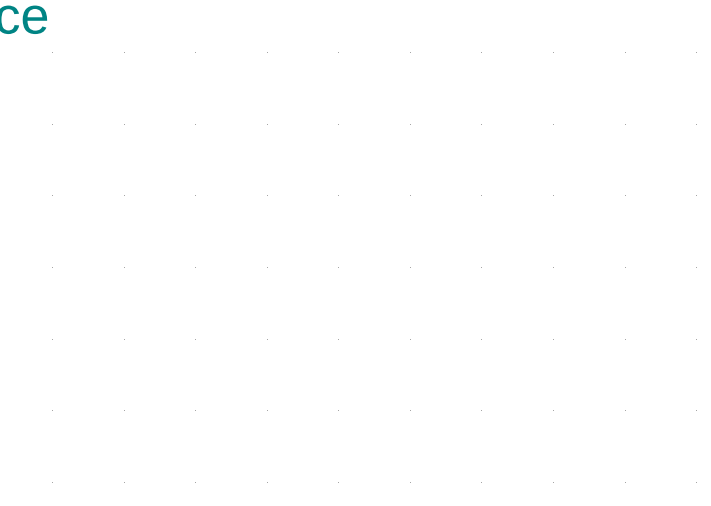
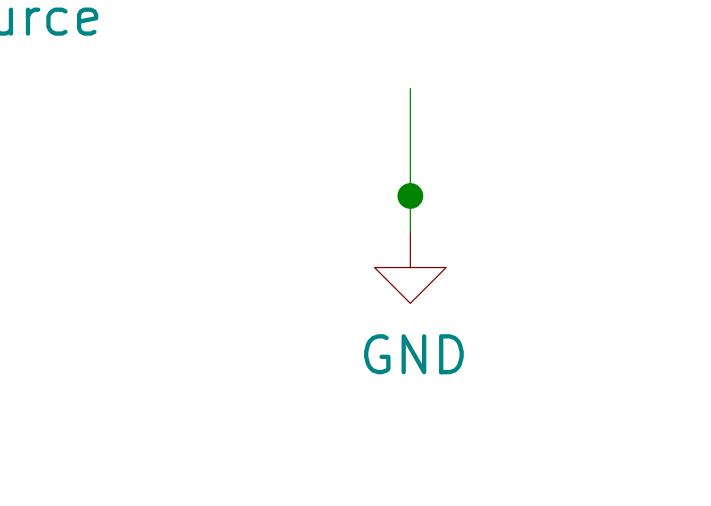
wire: none -> (410, 88) (410, 231)
junction: none -> (410, 195)
power symbol: none -> GND (410, 267)

